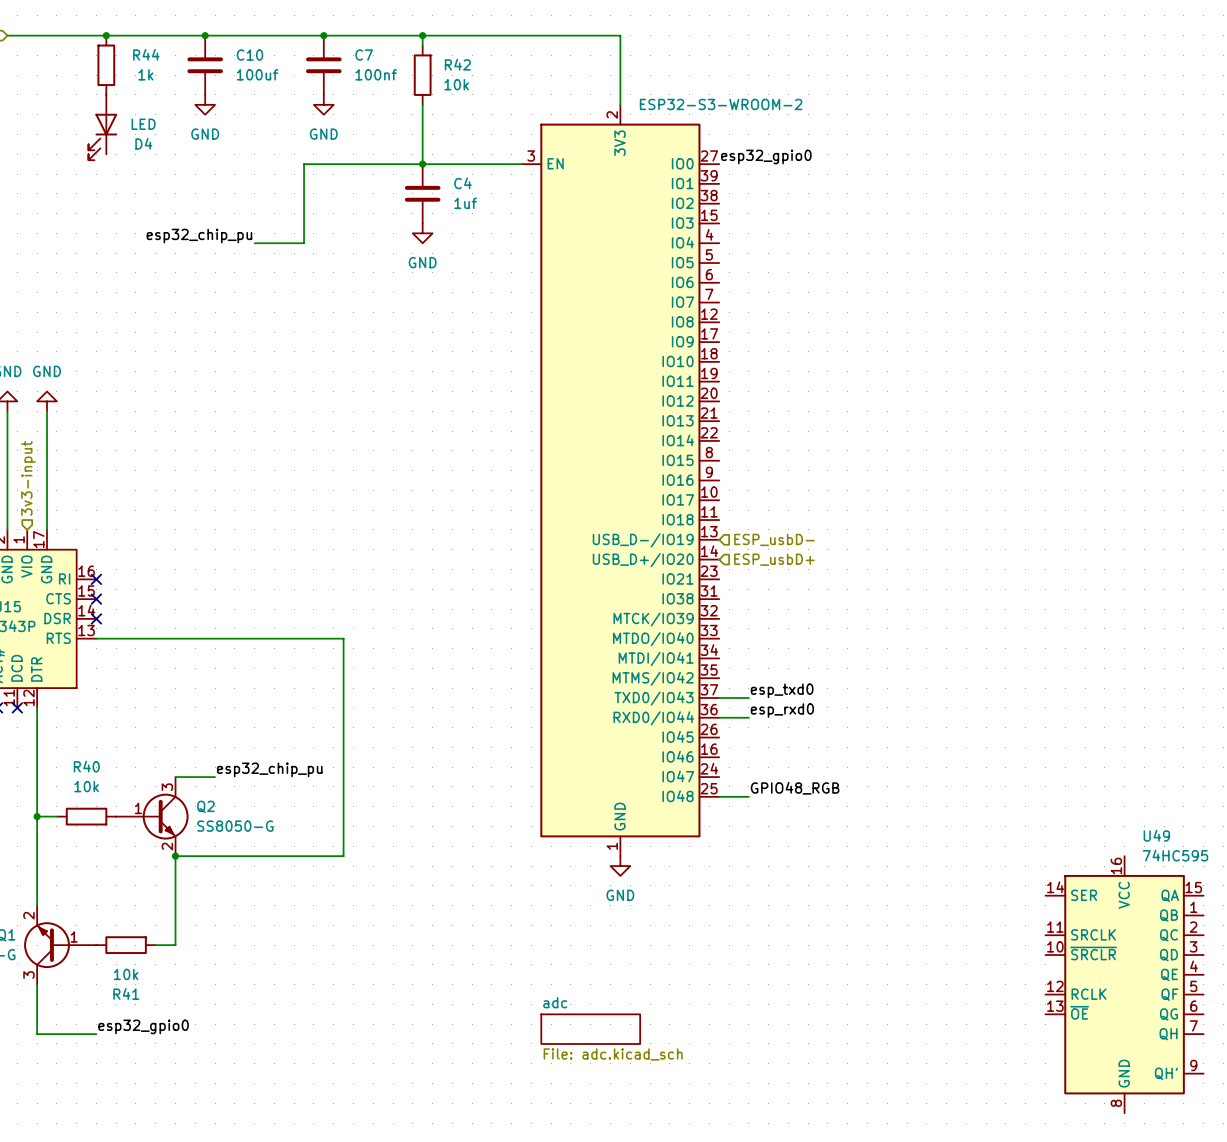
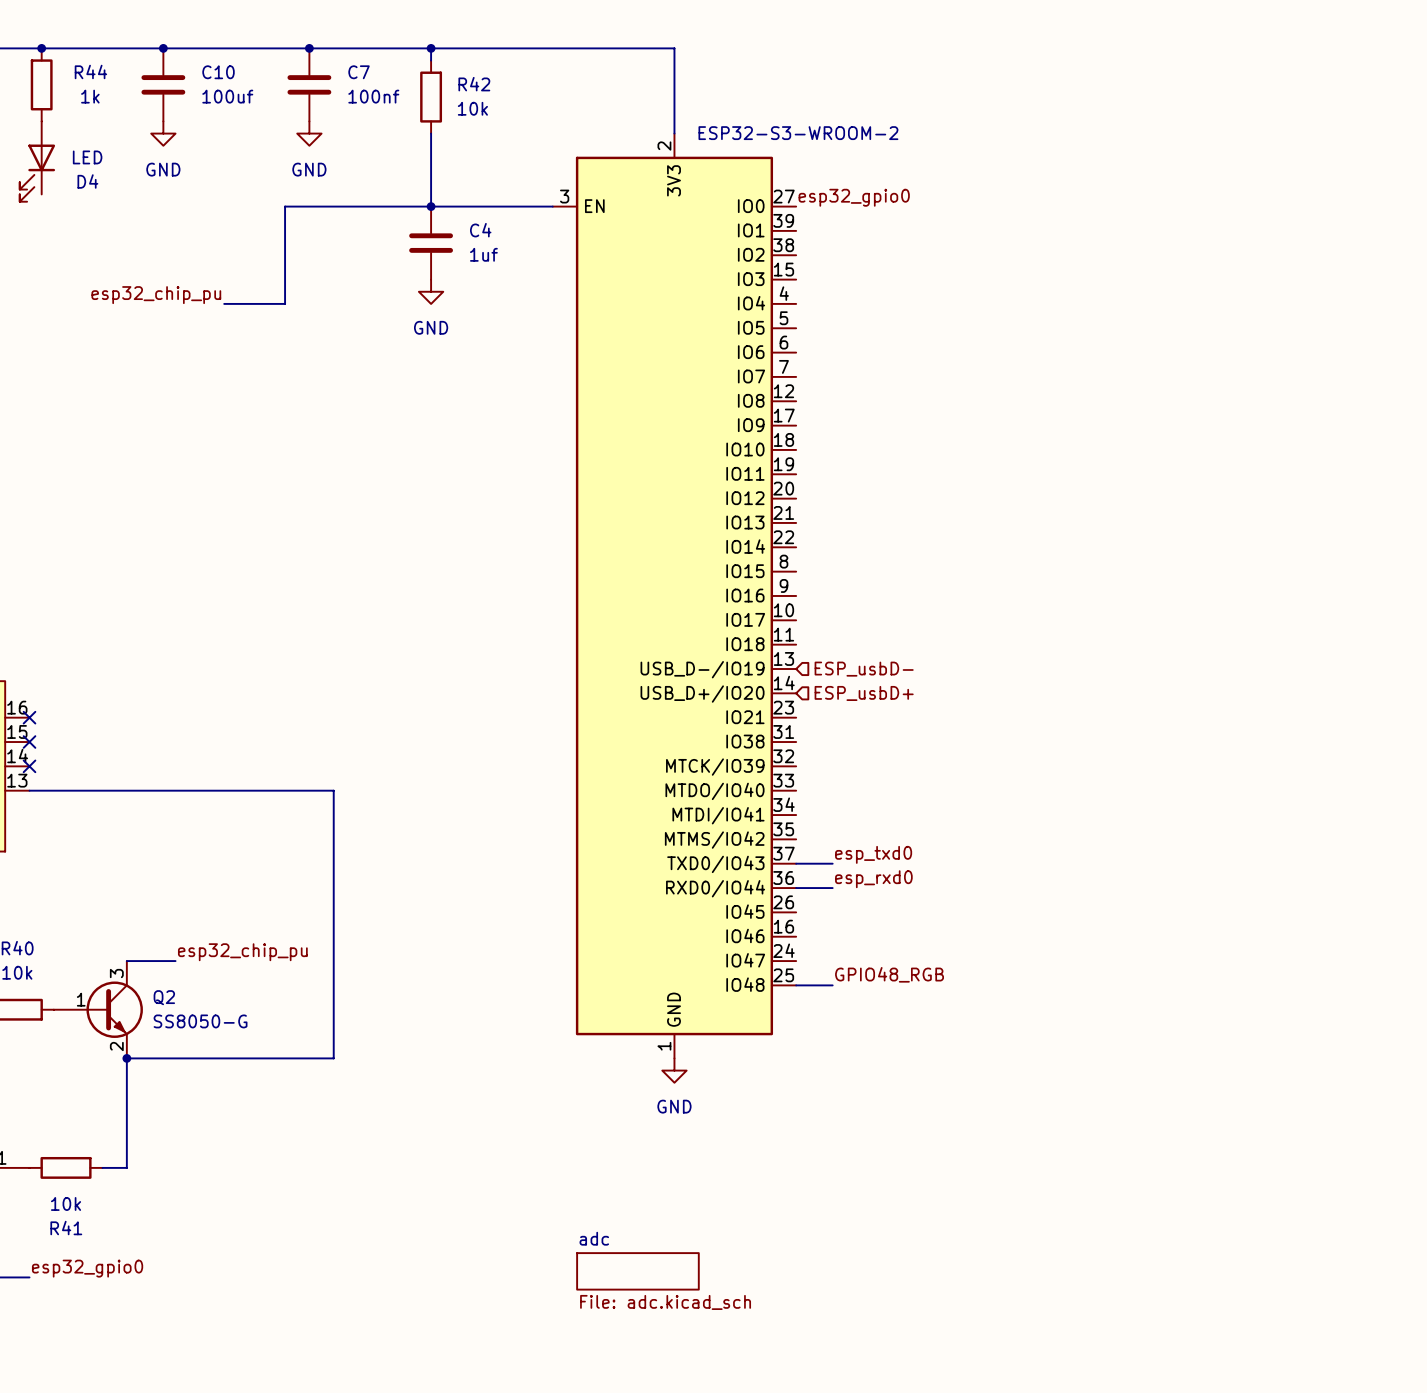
U49: 74HC595 (1124, 984) -> none

